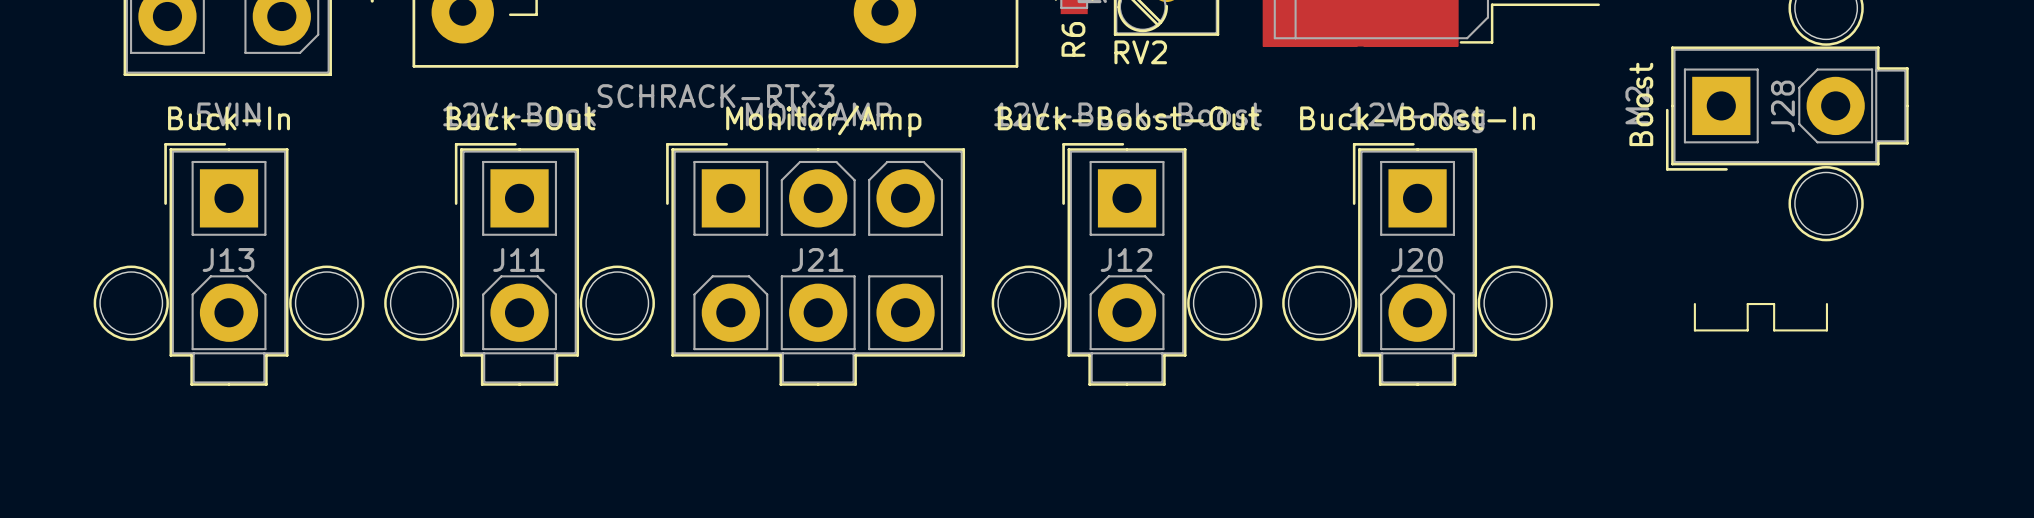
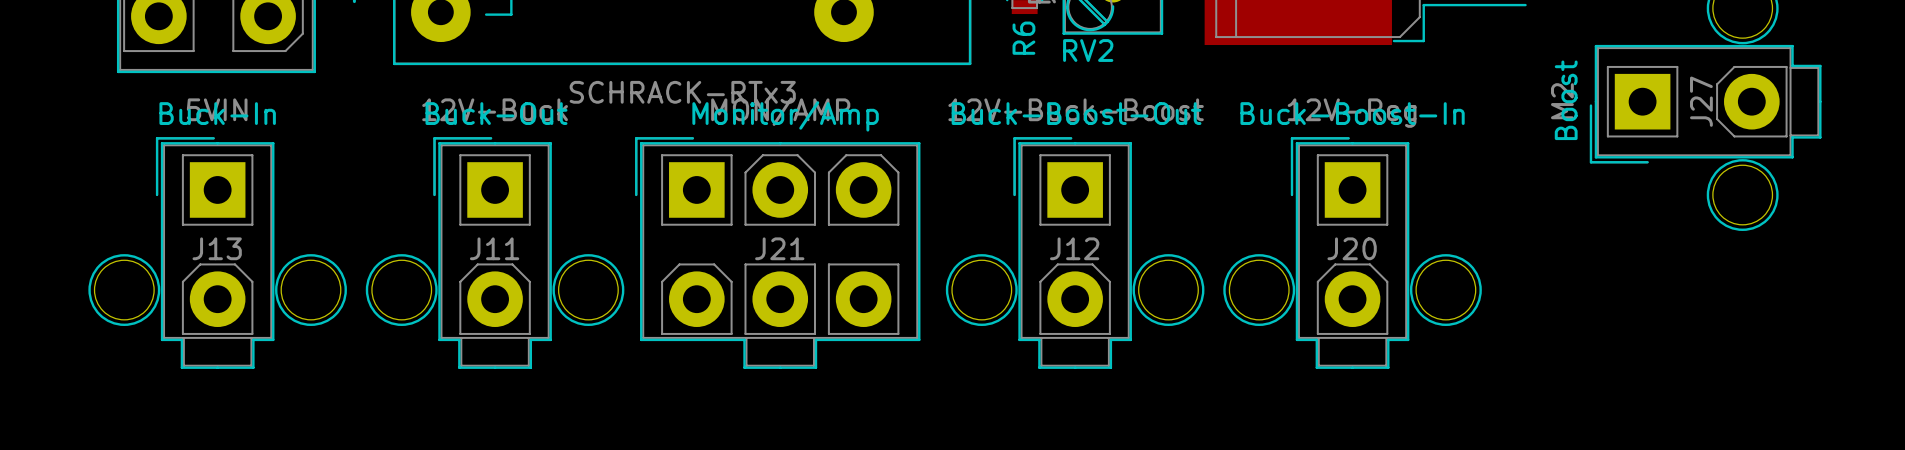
J28 name: J28 (1782, 106) -> J27 (1701, 101)
line: (1694, 304) (1694, 330) (1747, 330) (1747, 304) (1774, 304) (1774, 330) (1826, 330) (1826, 304) -> none

